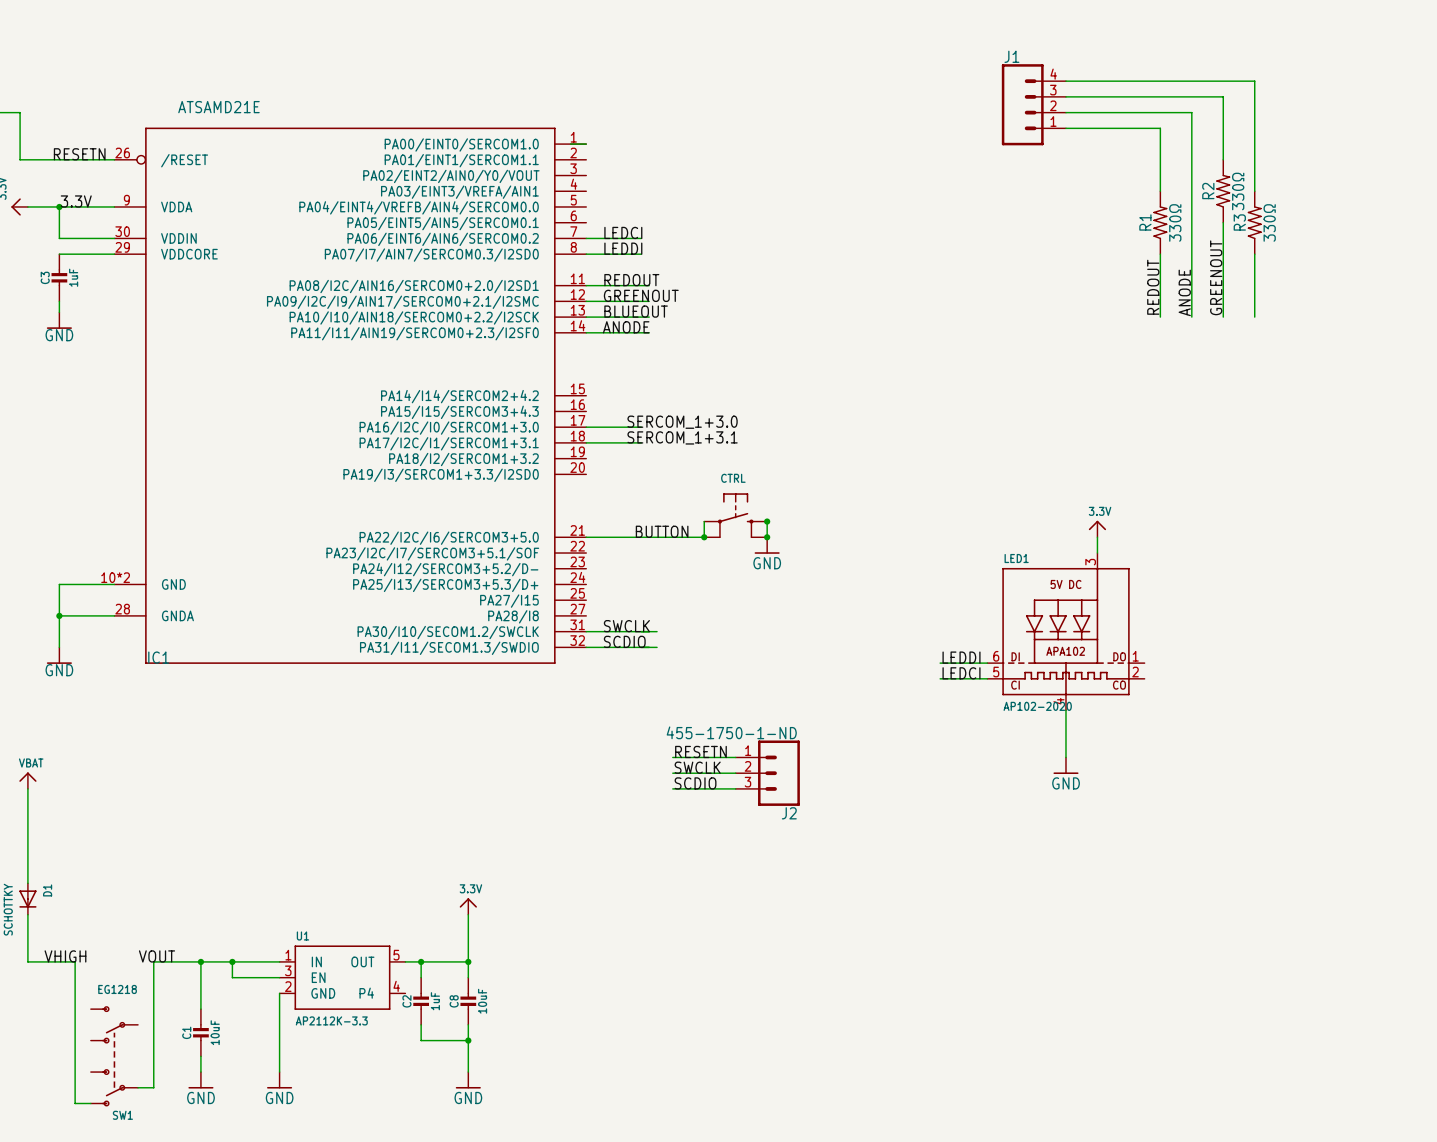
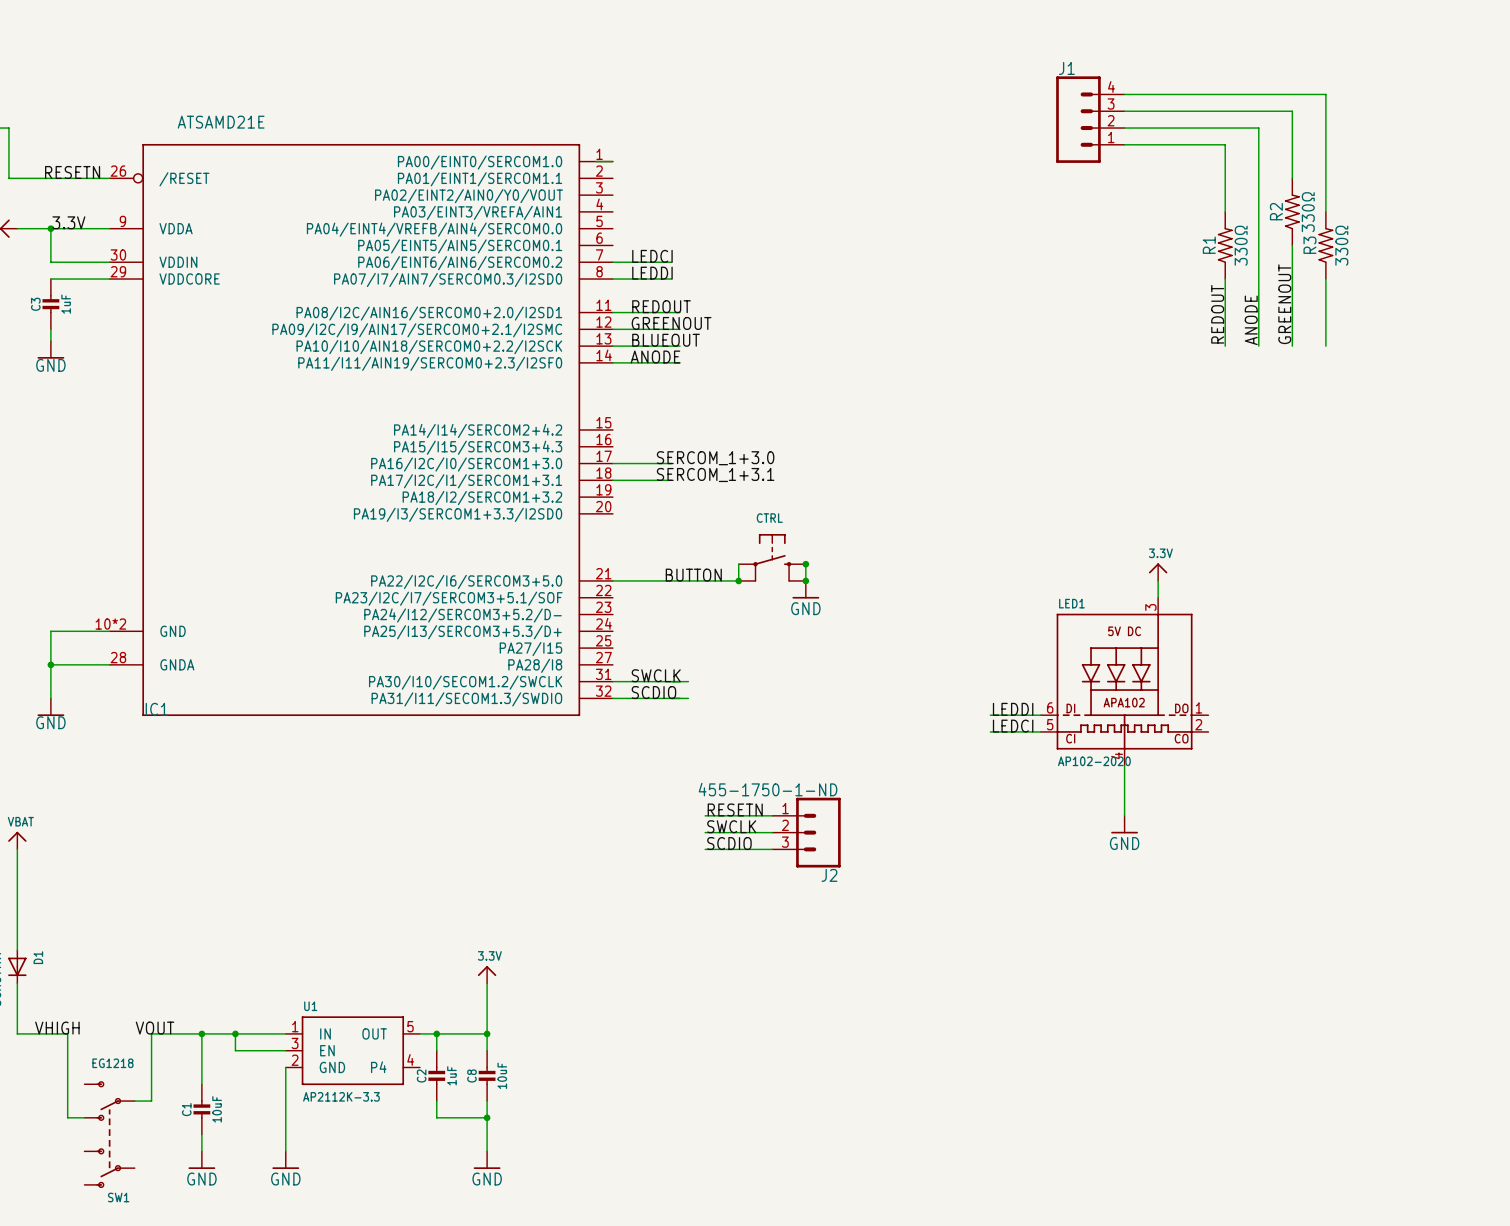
wire: (153, 1024) (153, 1087) (138, 1087) -> (151, 1101) (134, 1101)
wire: (75, 1040) (75, 1103) (90, 1103) -> (67, 1117) (84, 1117)

